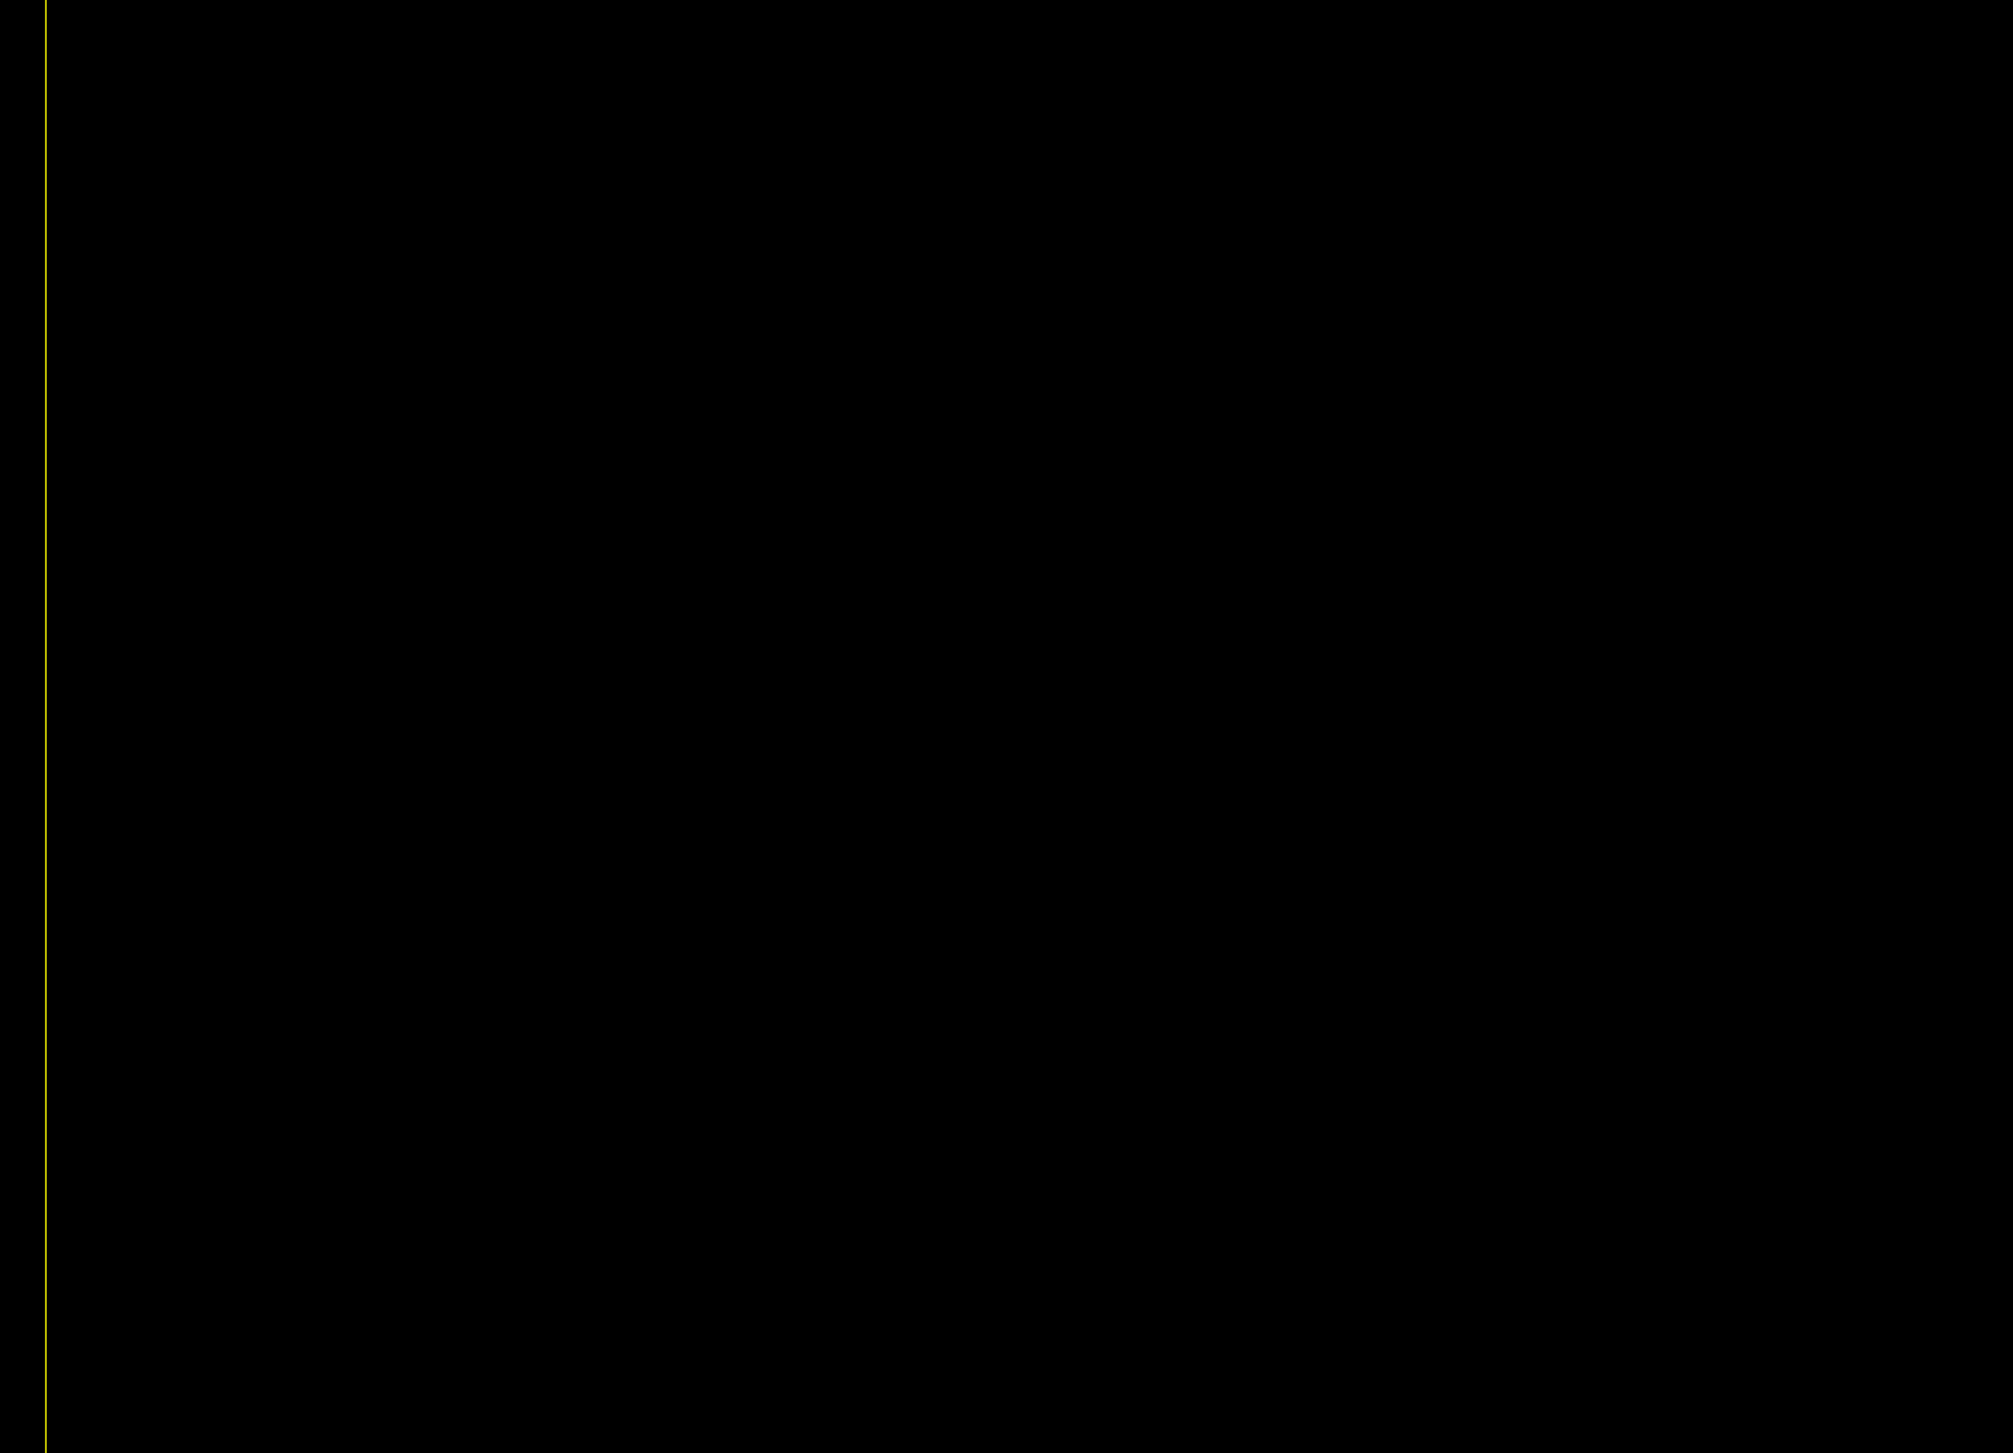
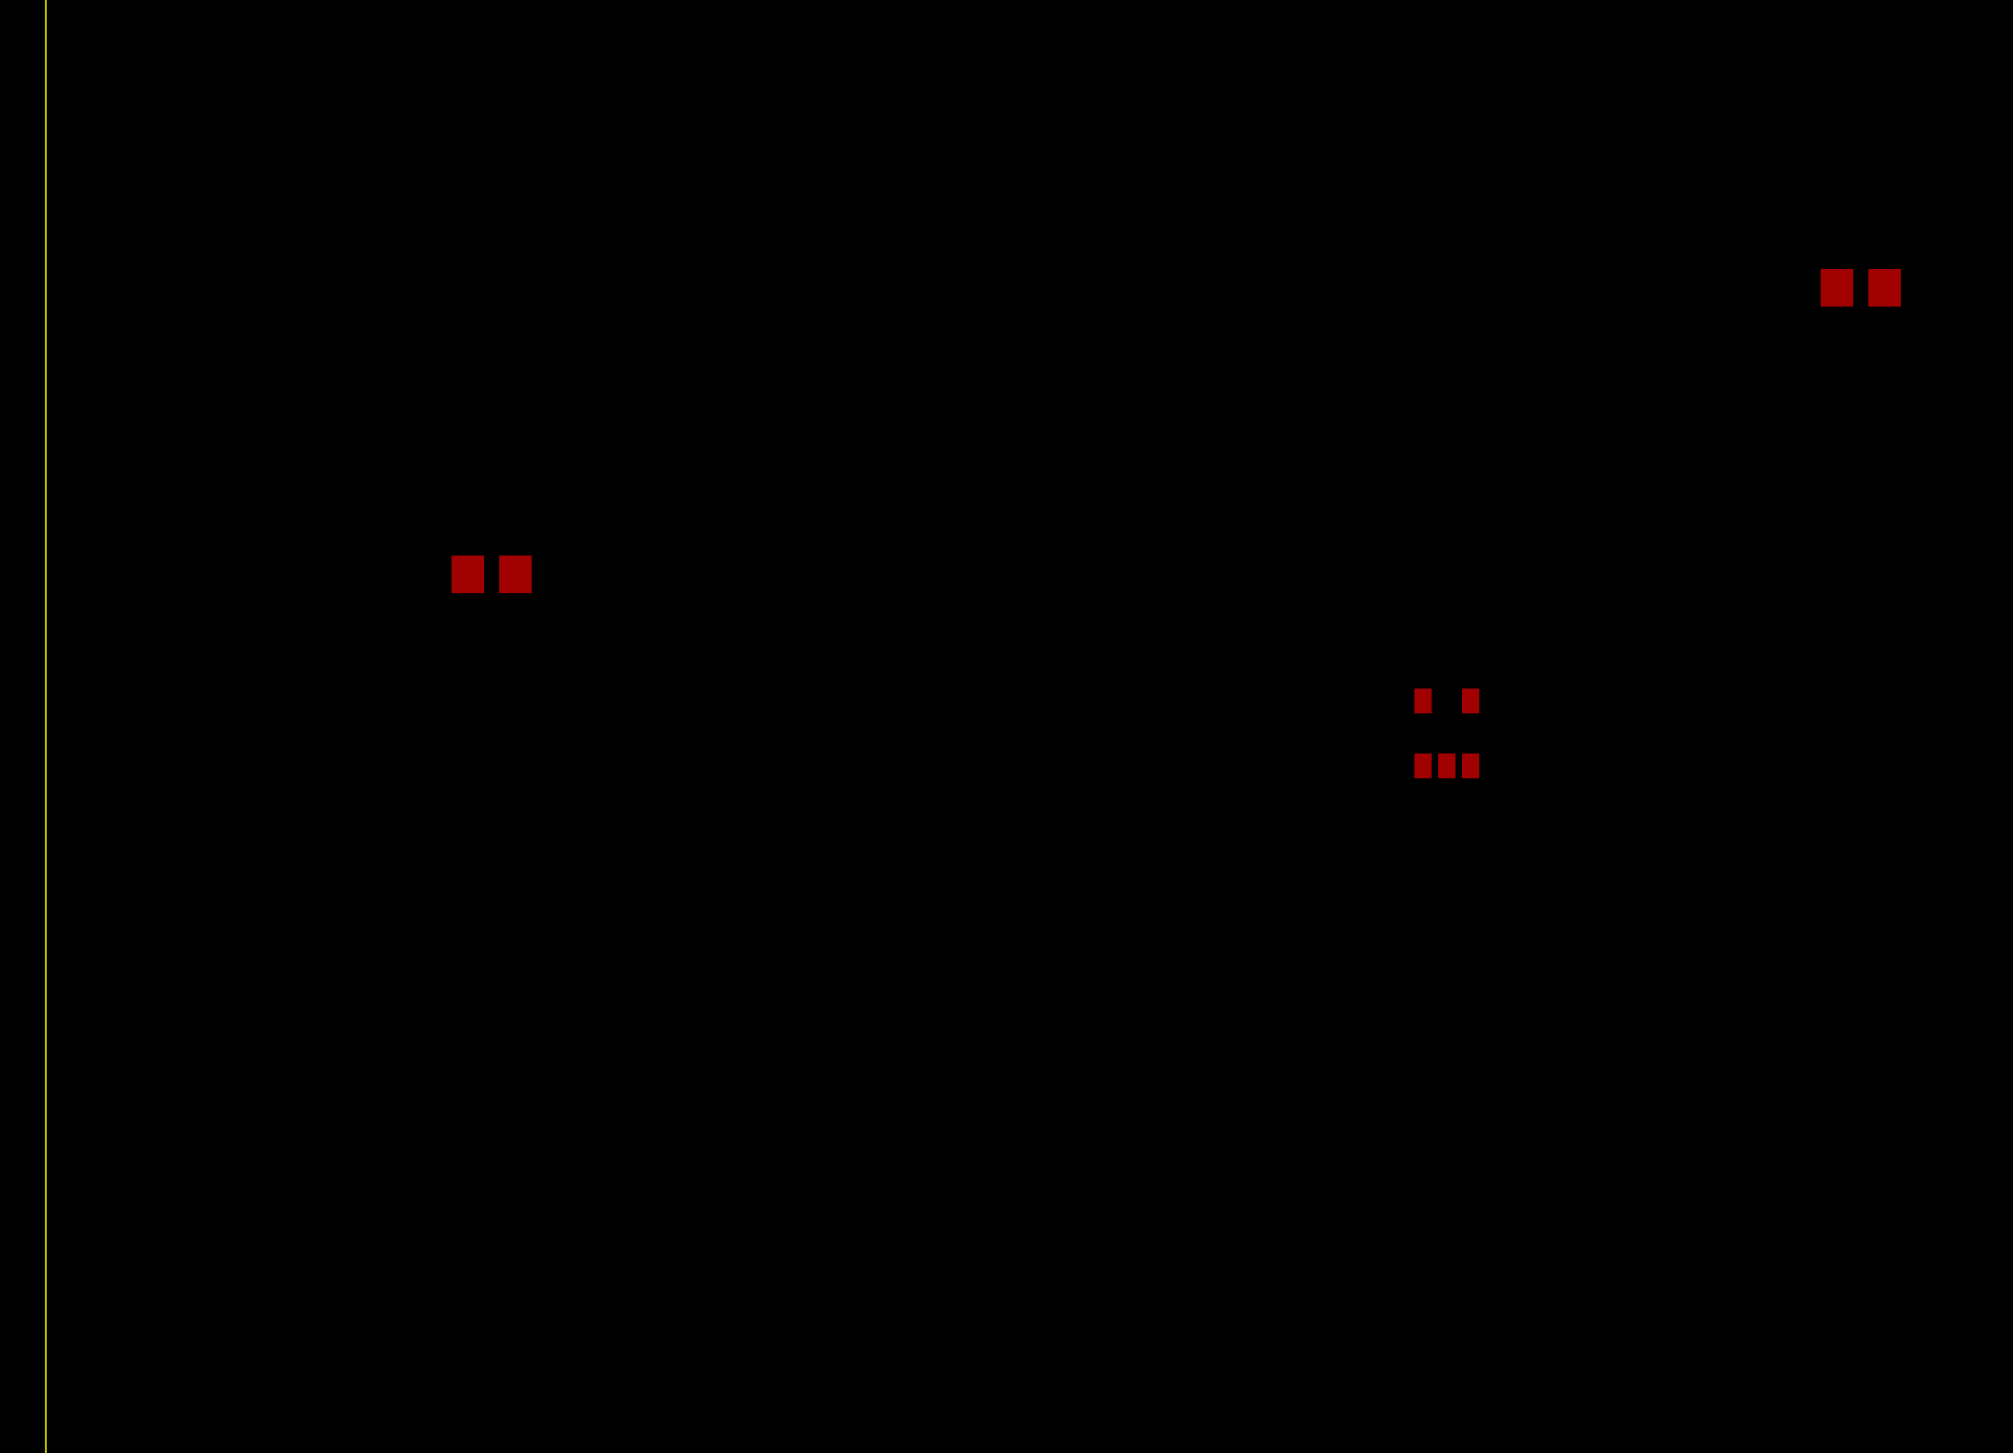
part: none -> (1860, 287)
part: none -> (491, 574)
part: none -> (1446, 733)

